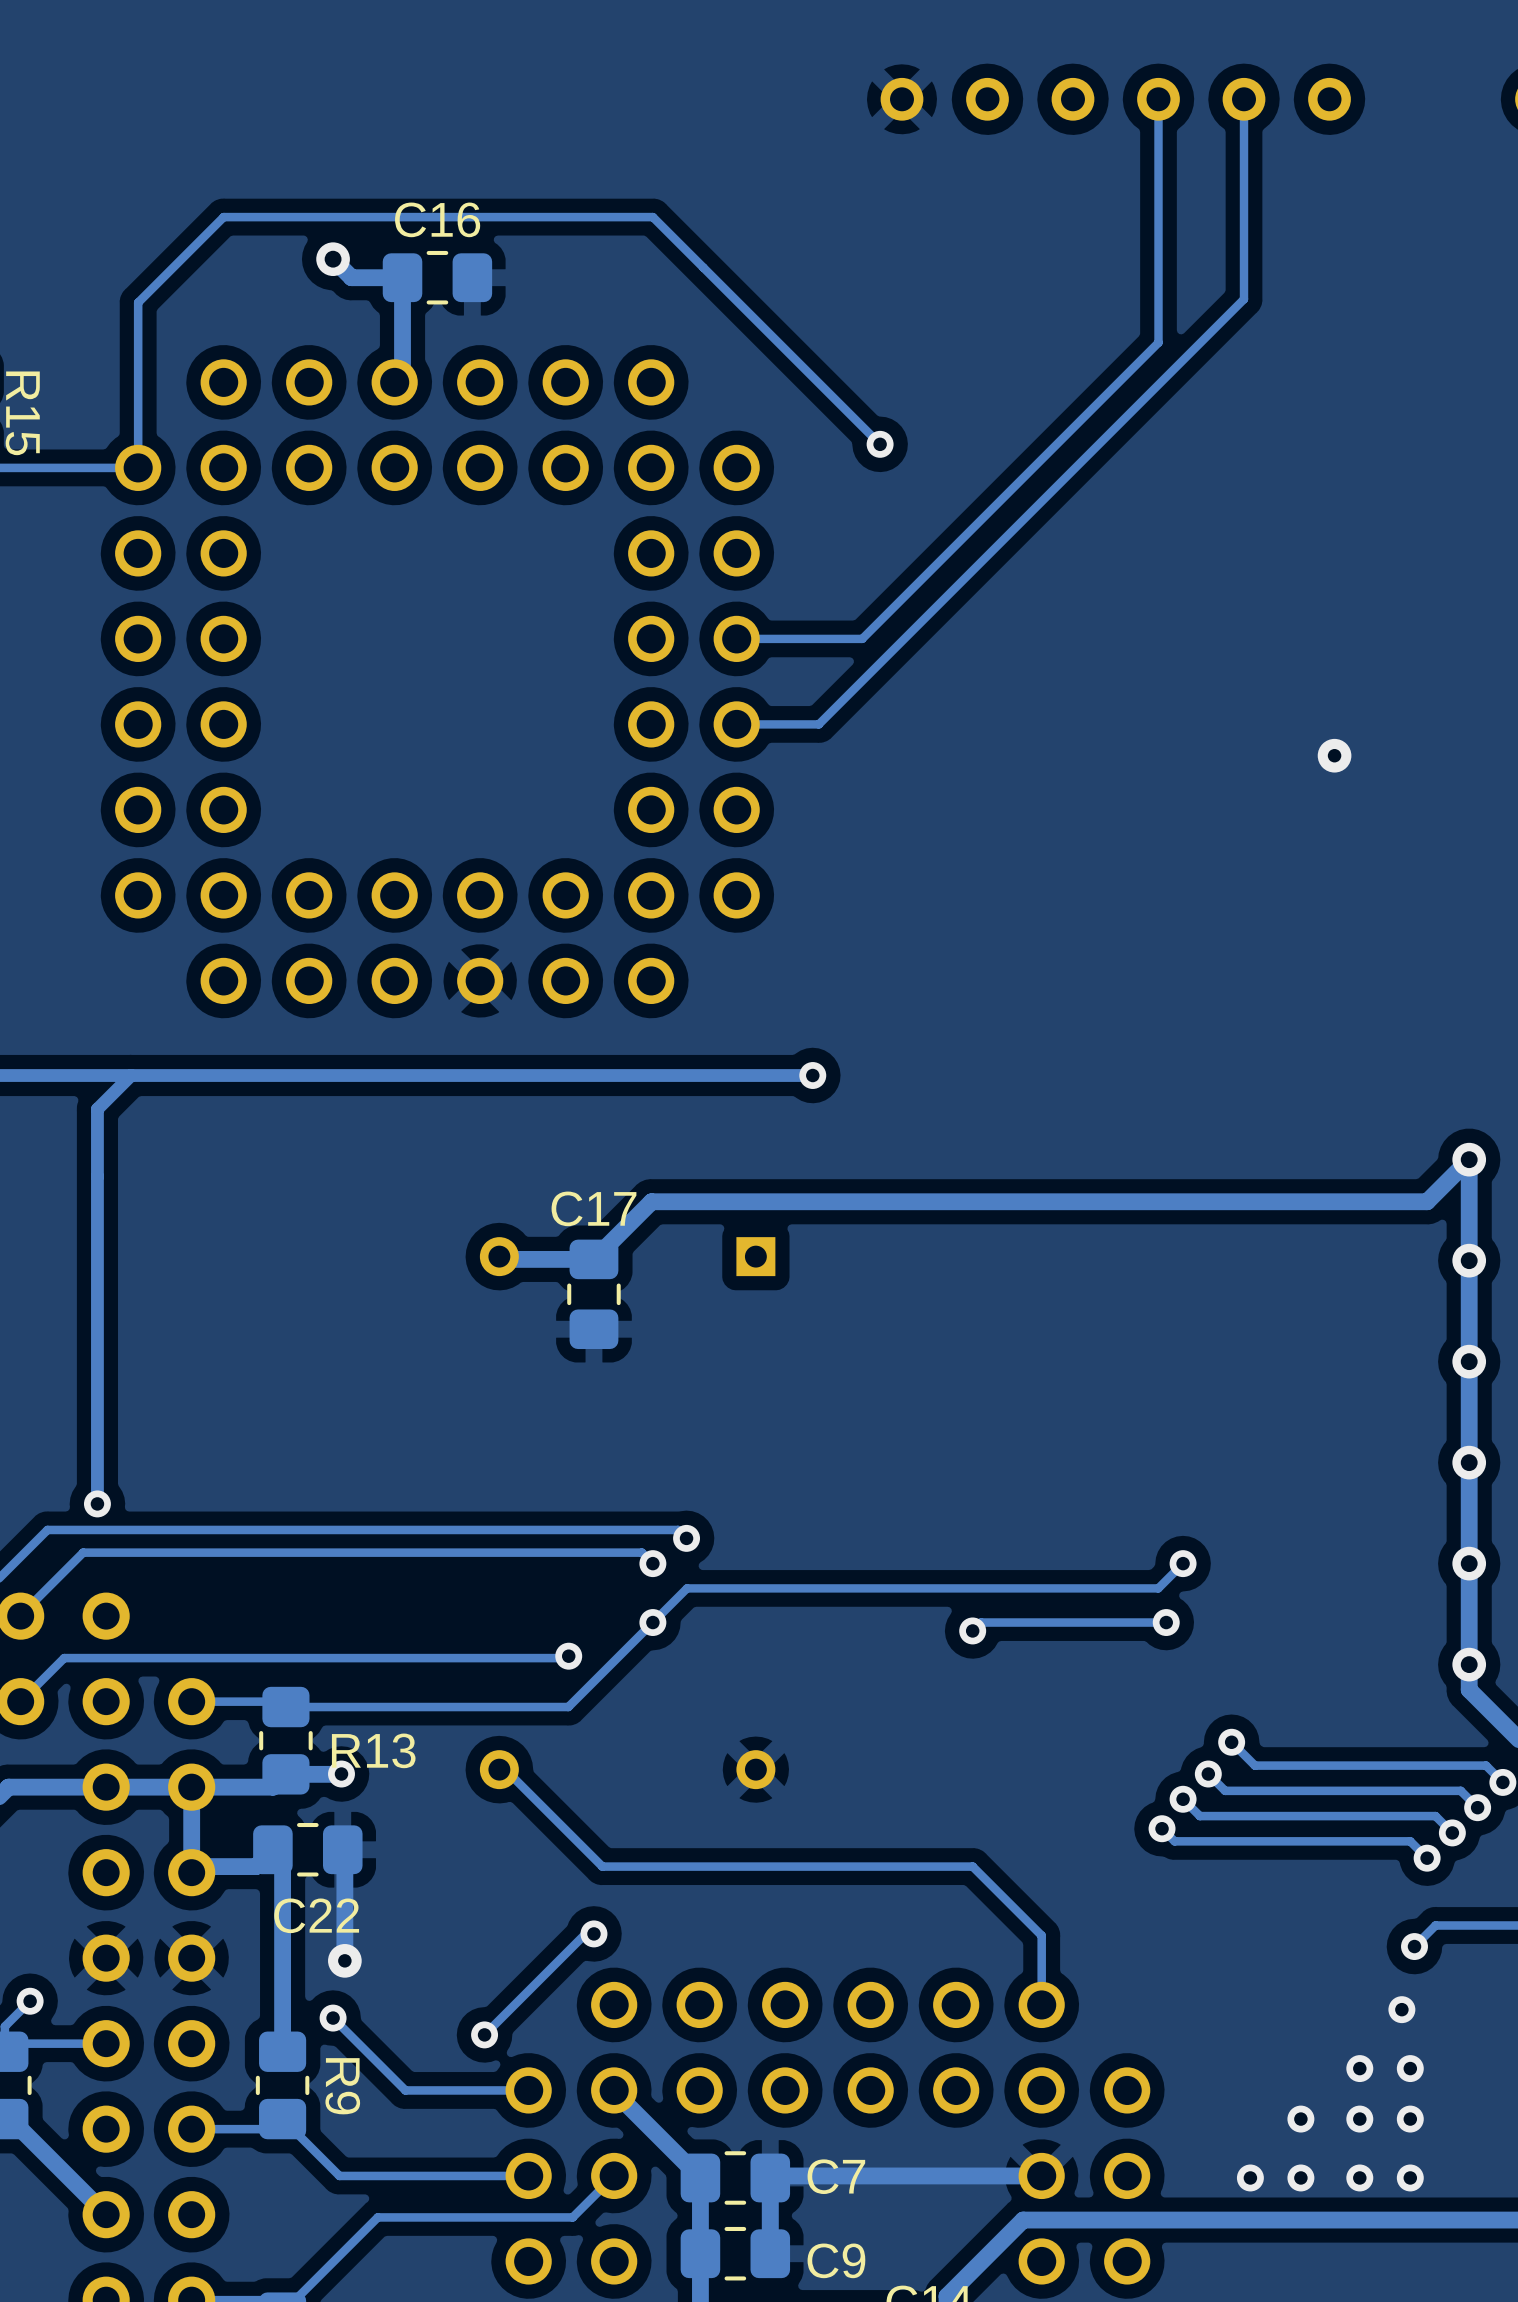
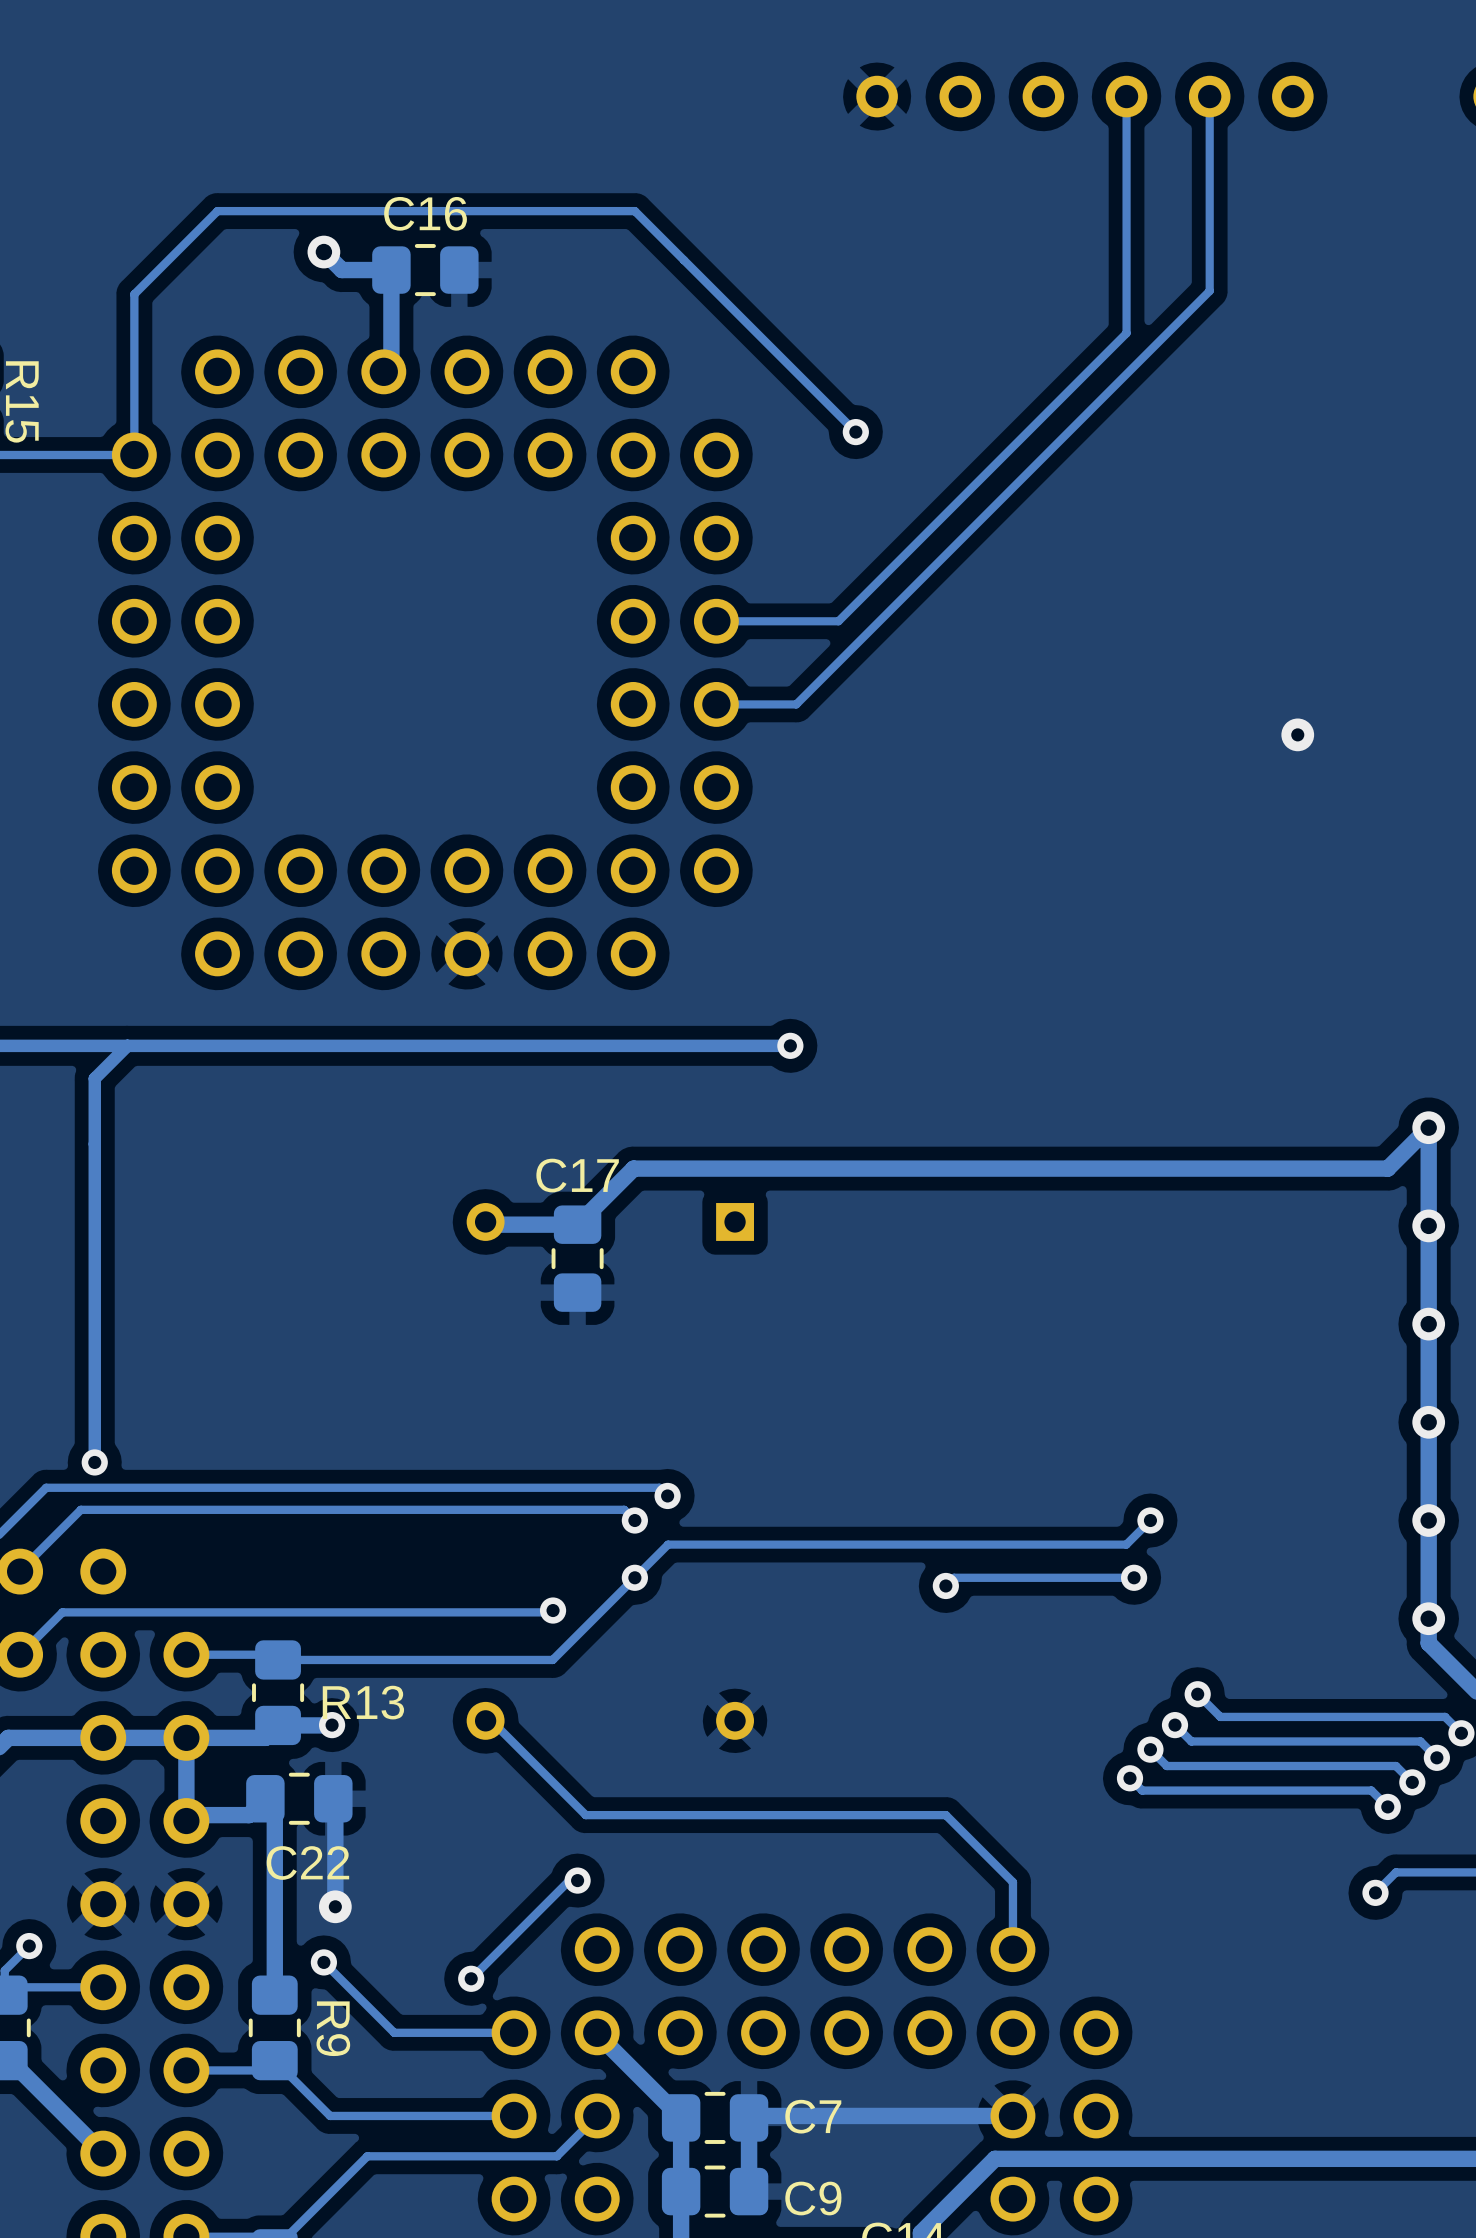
via: (1401, 2009) -> none
via: (1359, 2068) -> none
via: (1410, 2068) -> none
via: (1300, 2119) -> none
via: (1359, 2119) -> none
via: (1410, 2119) -> none
via: (1250, 2177) -> none
via: (1300, 2177) -> none
via: (1359, 2177) -> none
via: (1410, 2177) -> none

